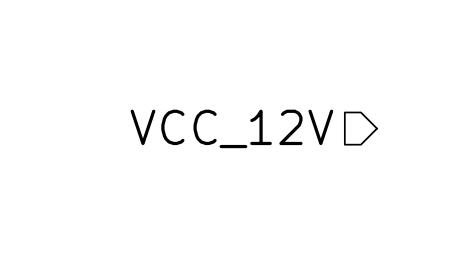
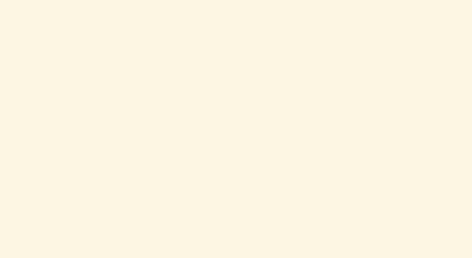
hierarchical label: VCC_12V (231, 128) -> none

